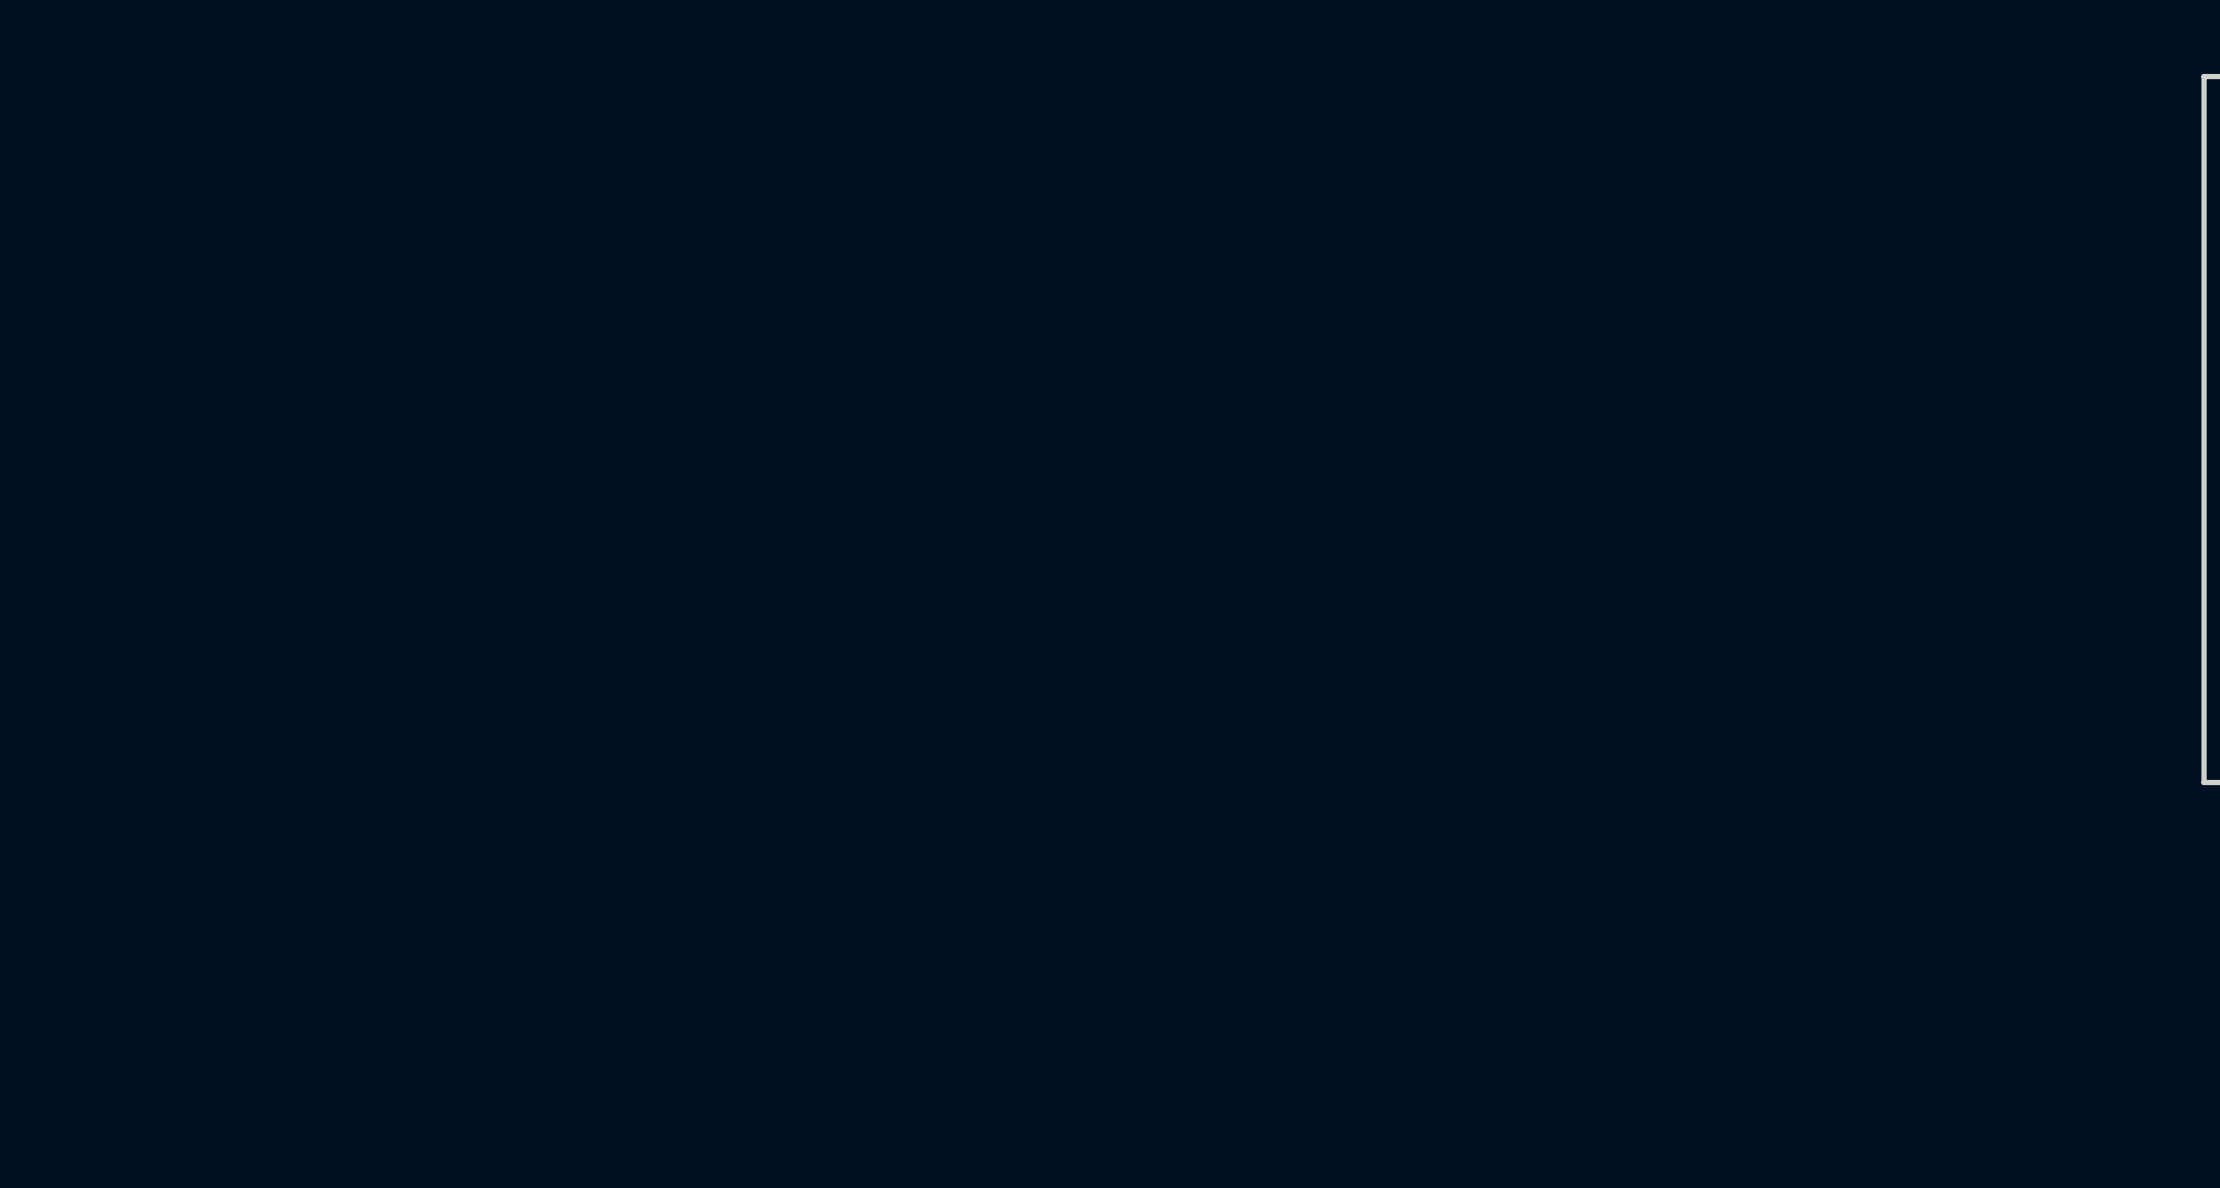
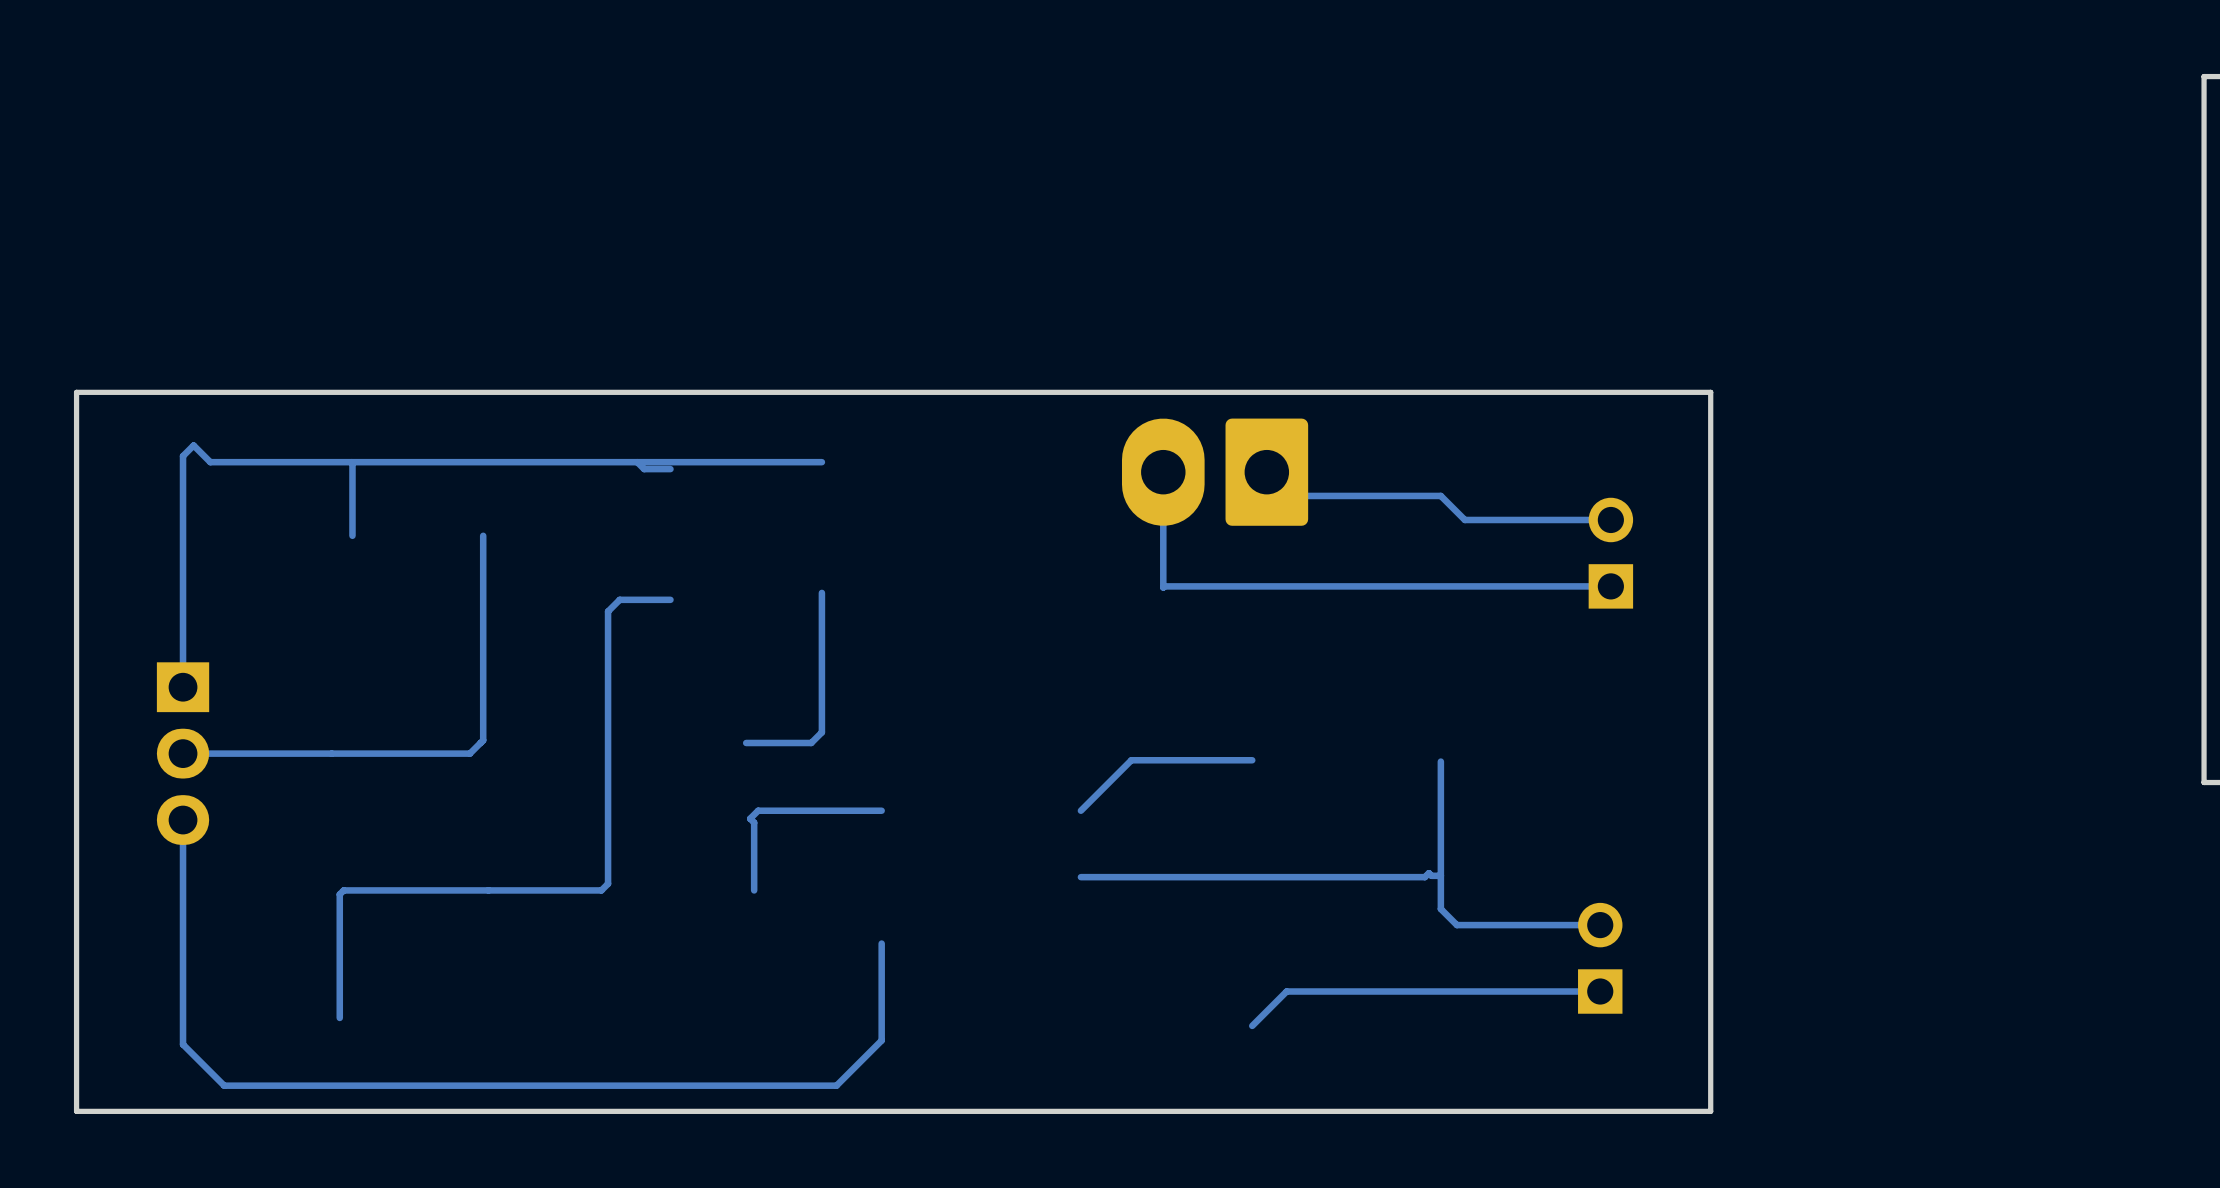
board edge: none -> (1710, 392) (76, 392) (76, 1111) (1710, 1111) (1710, 392)
bottom track: none -> (351, 462) (352, 535)
bottom track: none -> (637, 462) (644, 469) (670, 469)
bottom track: none -> (821, 462) (210, 462) (193, 445) (183, 456) (183, 687)
bottom track: none -> (1163, 472) (1163, 587) (1610, 586)
part: none -> (1215, 472)
bottom track: none -> (1266, 472) (1290, 495) (1440, 495) (1464, 519) (1610, 519)
bottom track: none -> (483, 535) (483, 740) (469, 753) (183, 753)
part: none -> (1610, 553)
bottom track: none -> (821, 592) (821, 732) (811, 743) (746, 743)
bottom track: none -> (670, 599) (619, 599) (608, 611) (608, 883) (601, 890) (343, 890) (339, 894) (339, 1017)
part: none -> (183, 753)
bottom track: none -> (1252, 760) (1131, 760) (1080, 810)
bottom track: none -> (1440, 761) (1440, 909) (1456, 925) (1600, 925)
bottom track: none -> (881, 810) (758, 810) (750, 818) (754, 822) (754, 890)
bottom track: none -> (183, 820) (183, 1044) (224, 1085) (836, 1085) (881, 1040) (881, 943)
bottom track: none -> (1440, 875) (1431, 875) (1428, 873) (1424, 877) (1080, 877)
part: none -> (1600, 958)
bottom track: none -> (1600, 991) (1286, 991) (1252, 1025)

